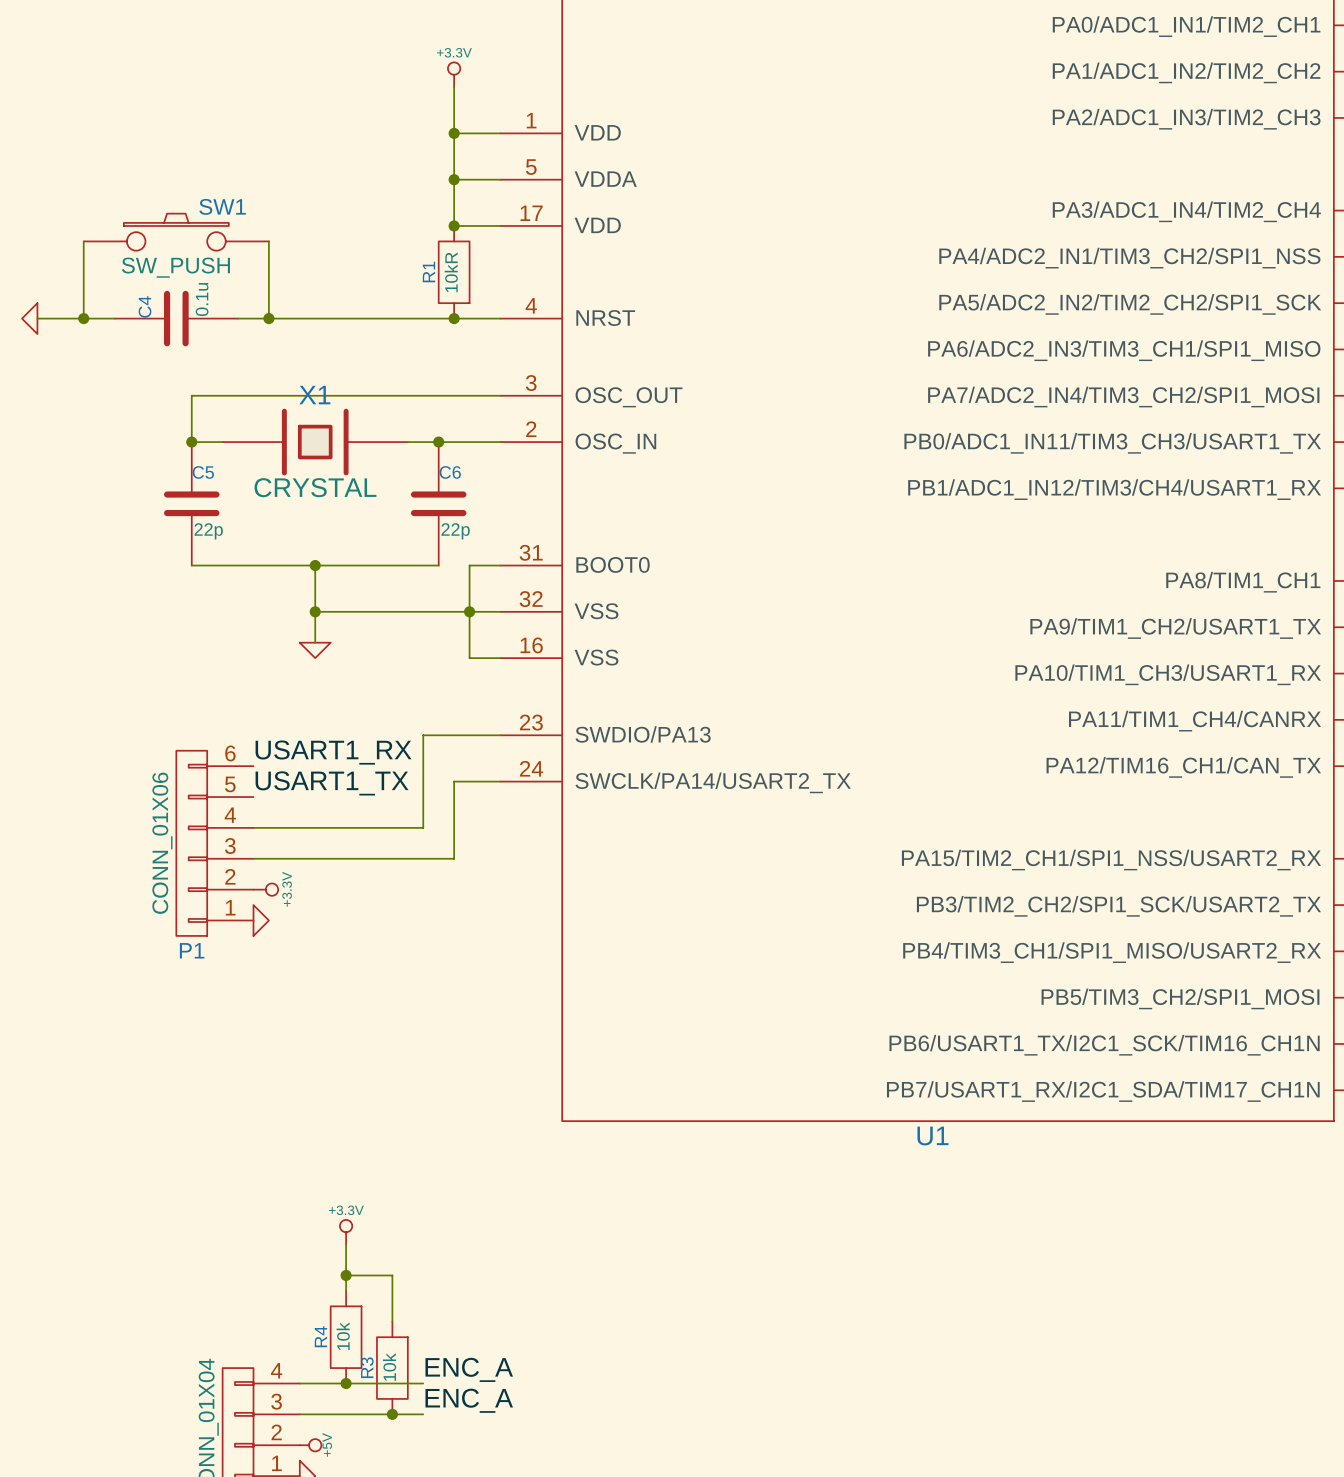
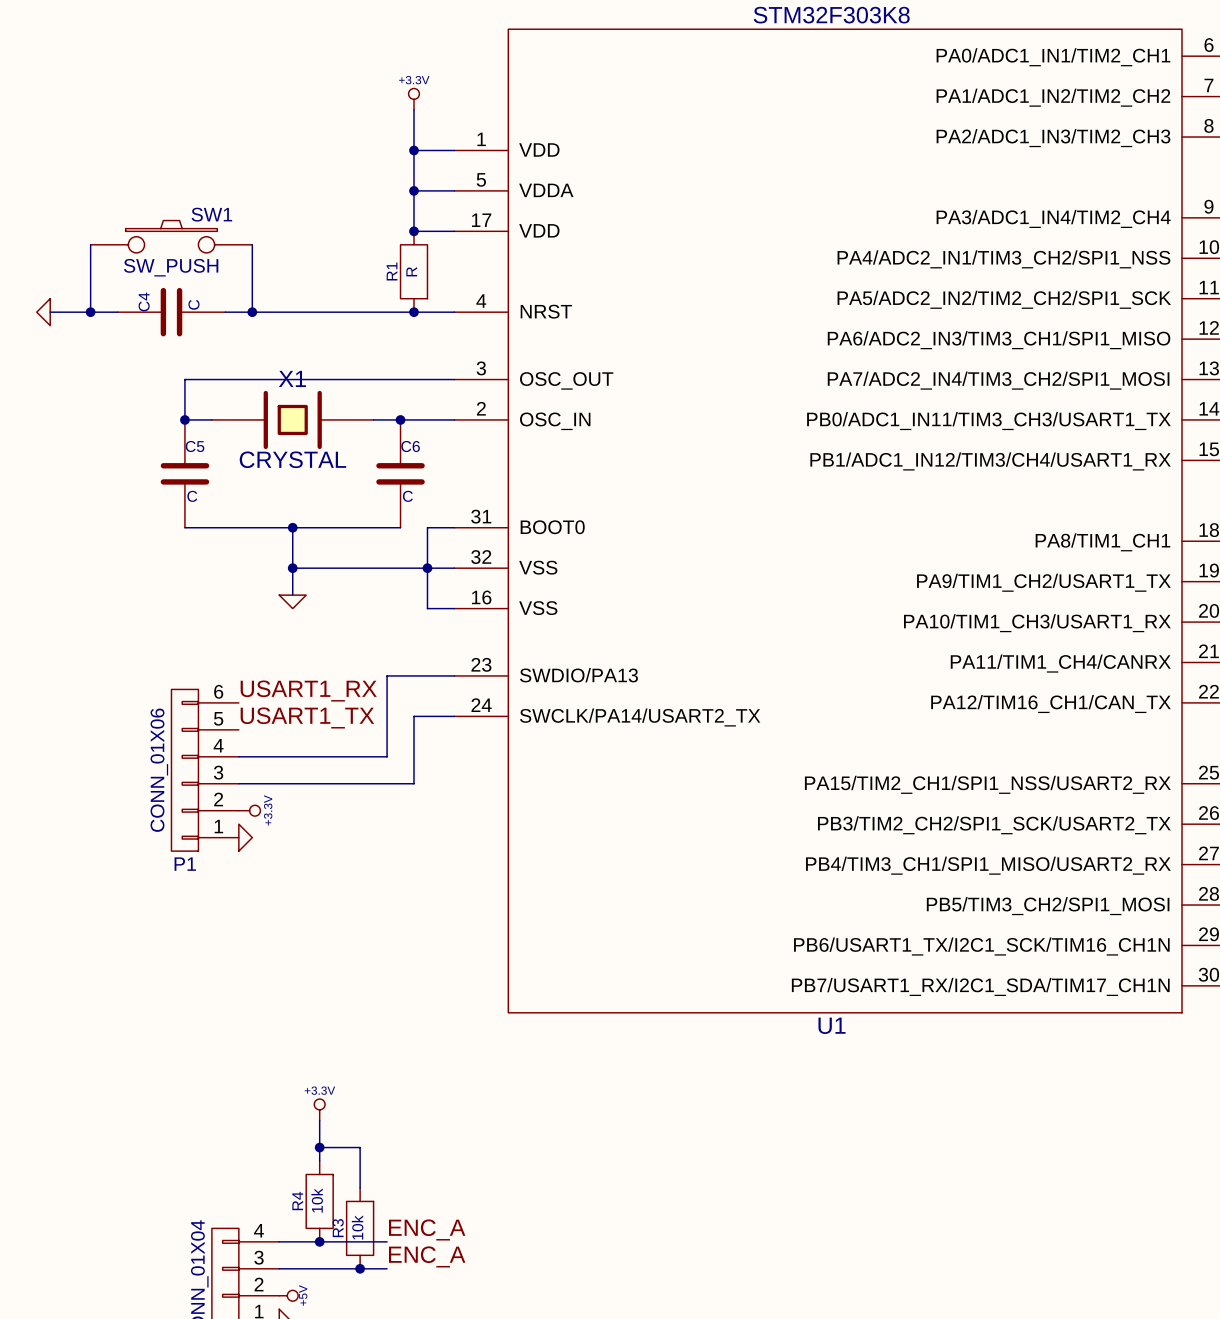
R1 value: 10kR (451, 272) -> R (411, 271)
C4 value: 0.1u (202, 299) -> C (193, 304)
C5 value: 22p (208, 531) -> C (192, 496)
C6 value: 22p (455, 531) -> C (407, 496)

